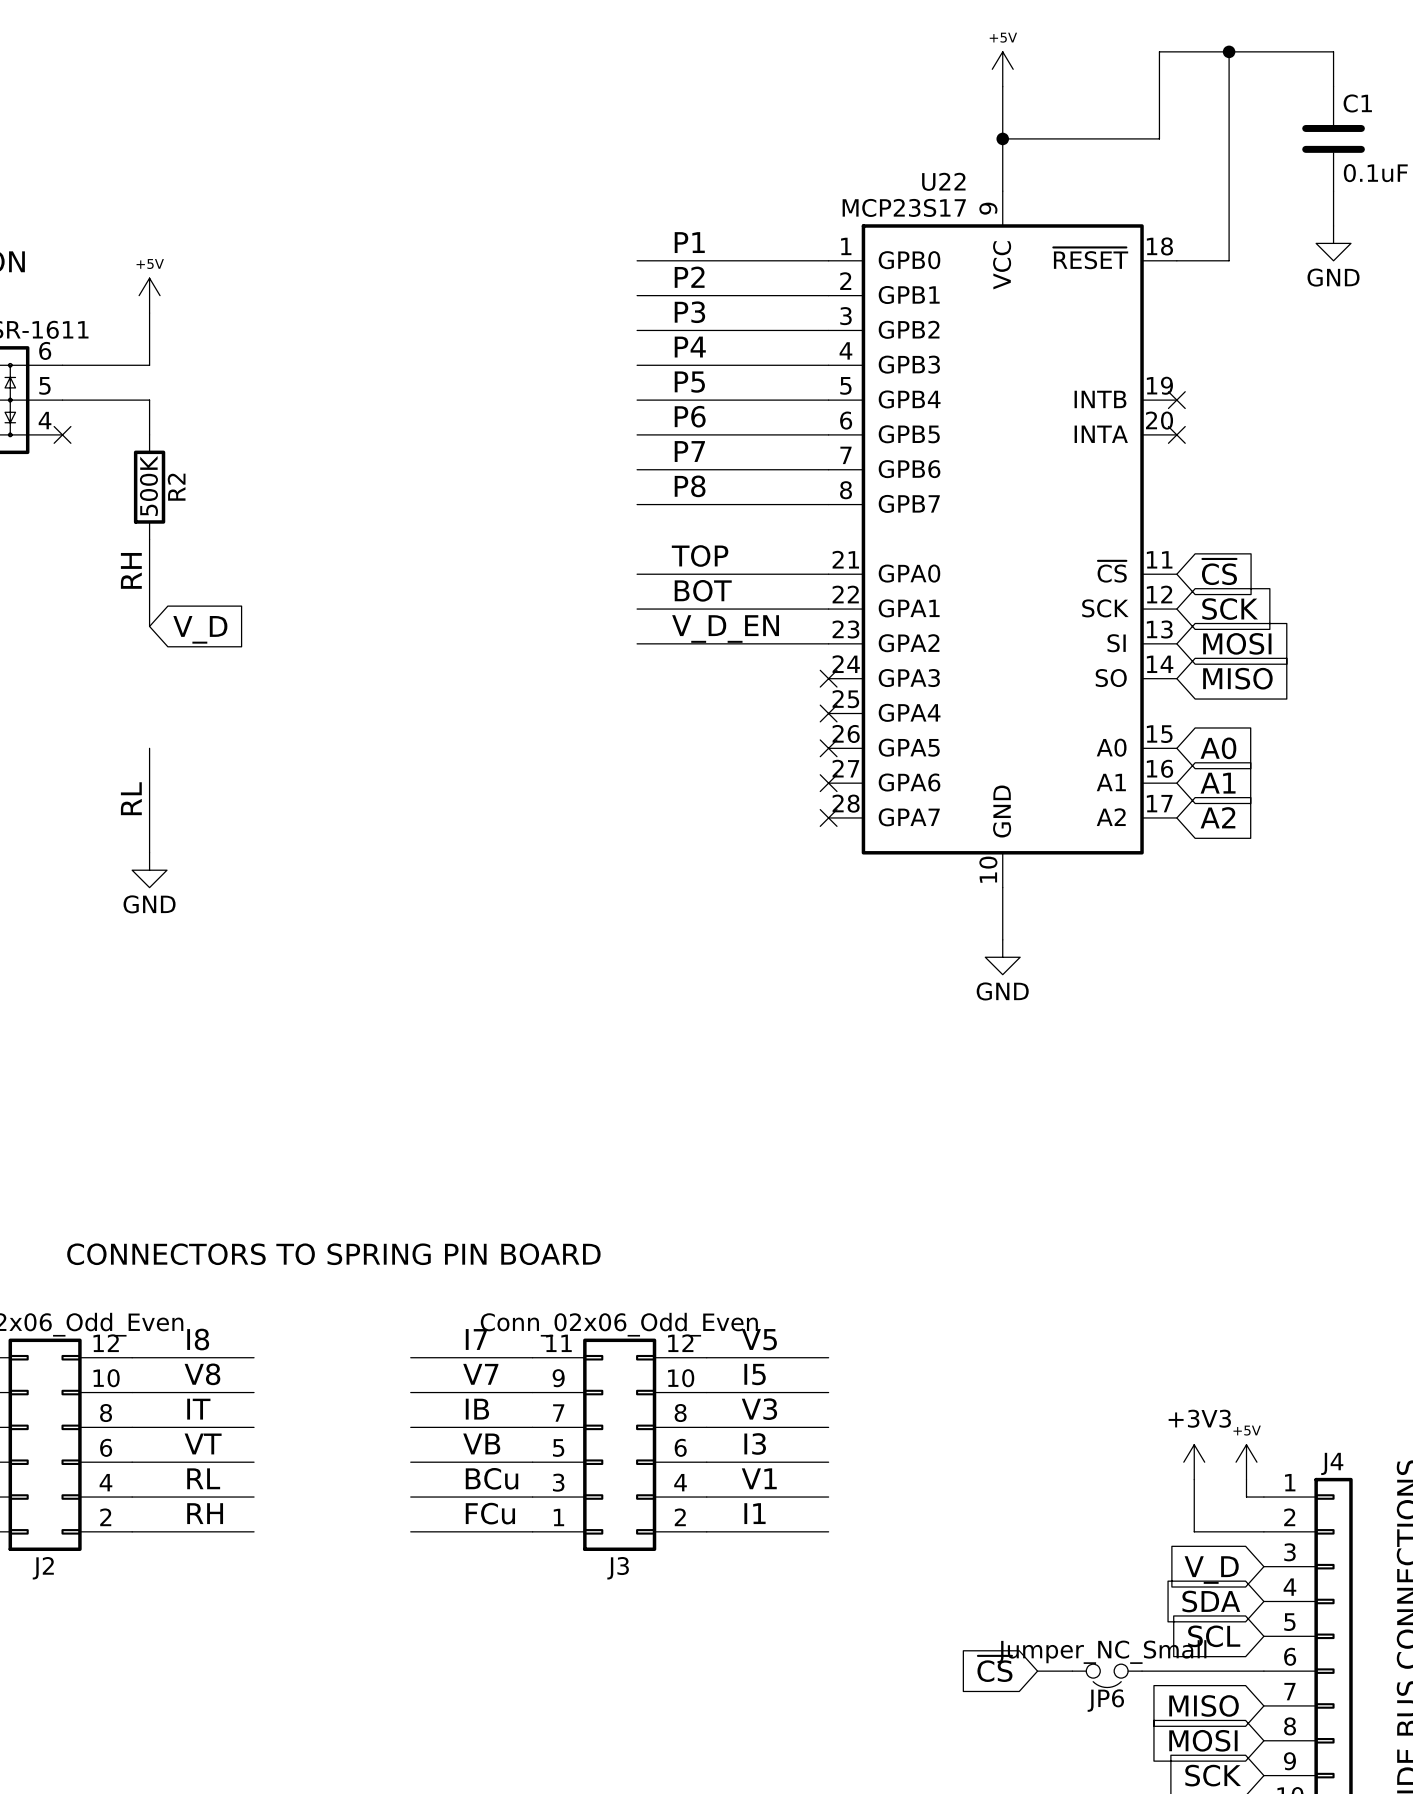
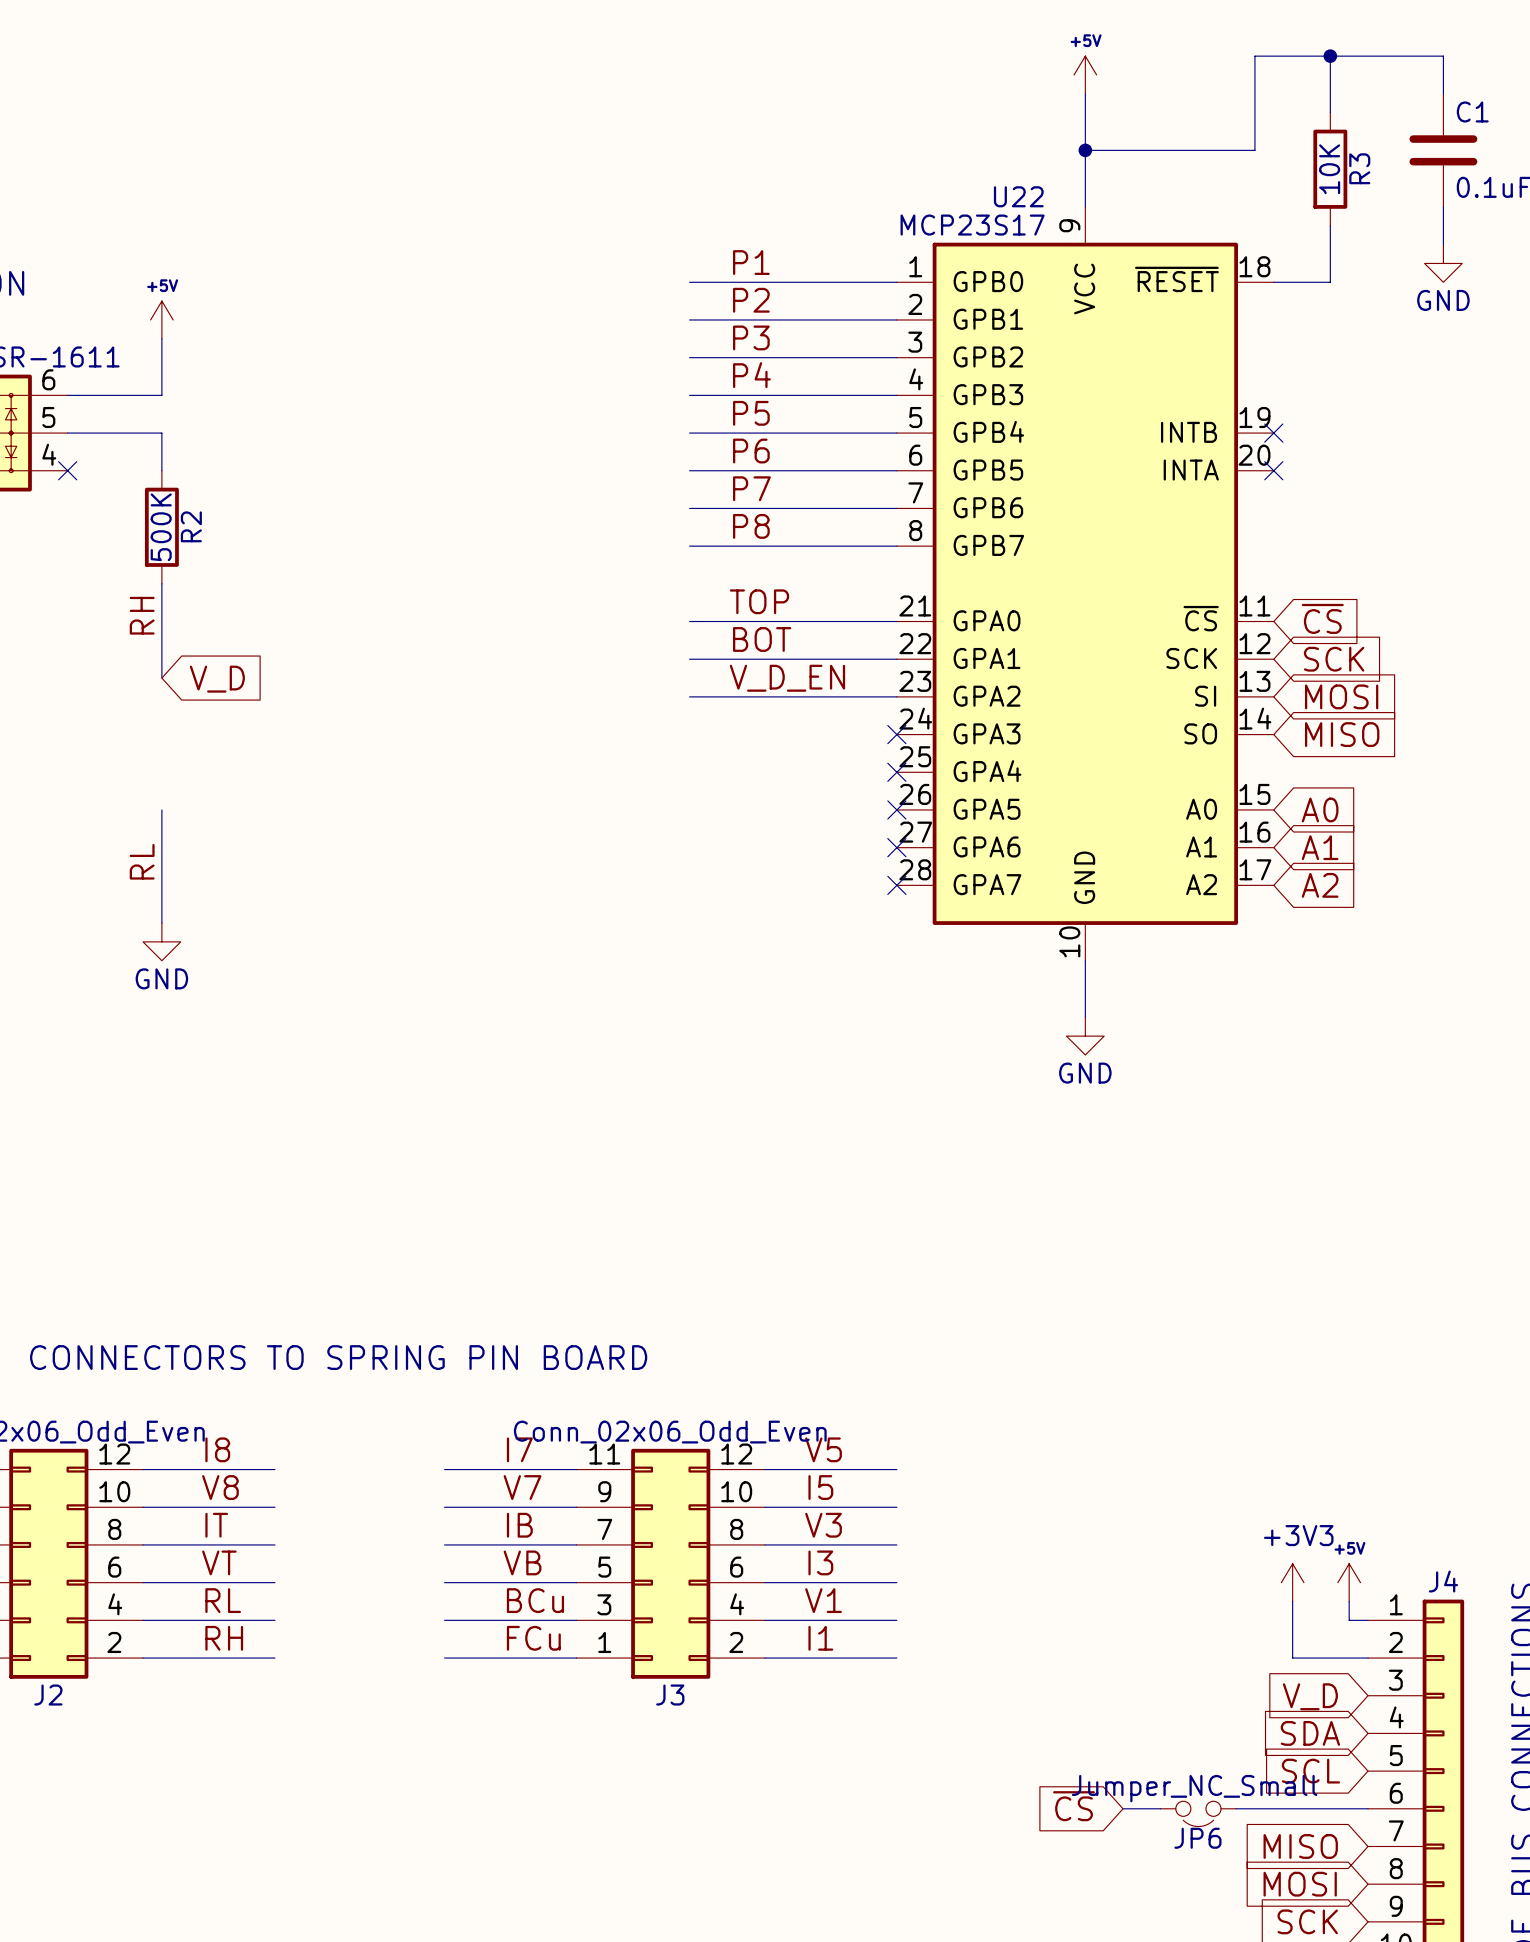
wire: (1229, 104) (1229, 208) -> none
R3: none -> 10K (1330, 169)

